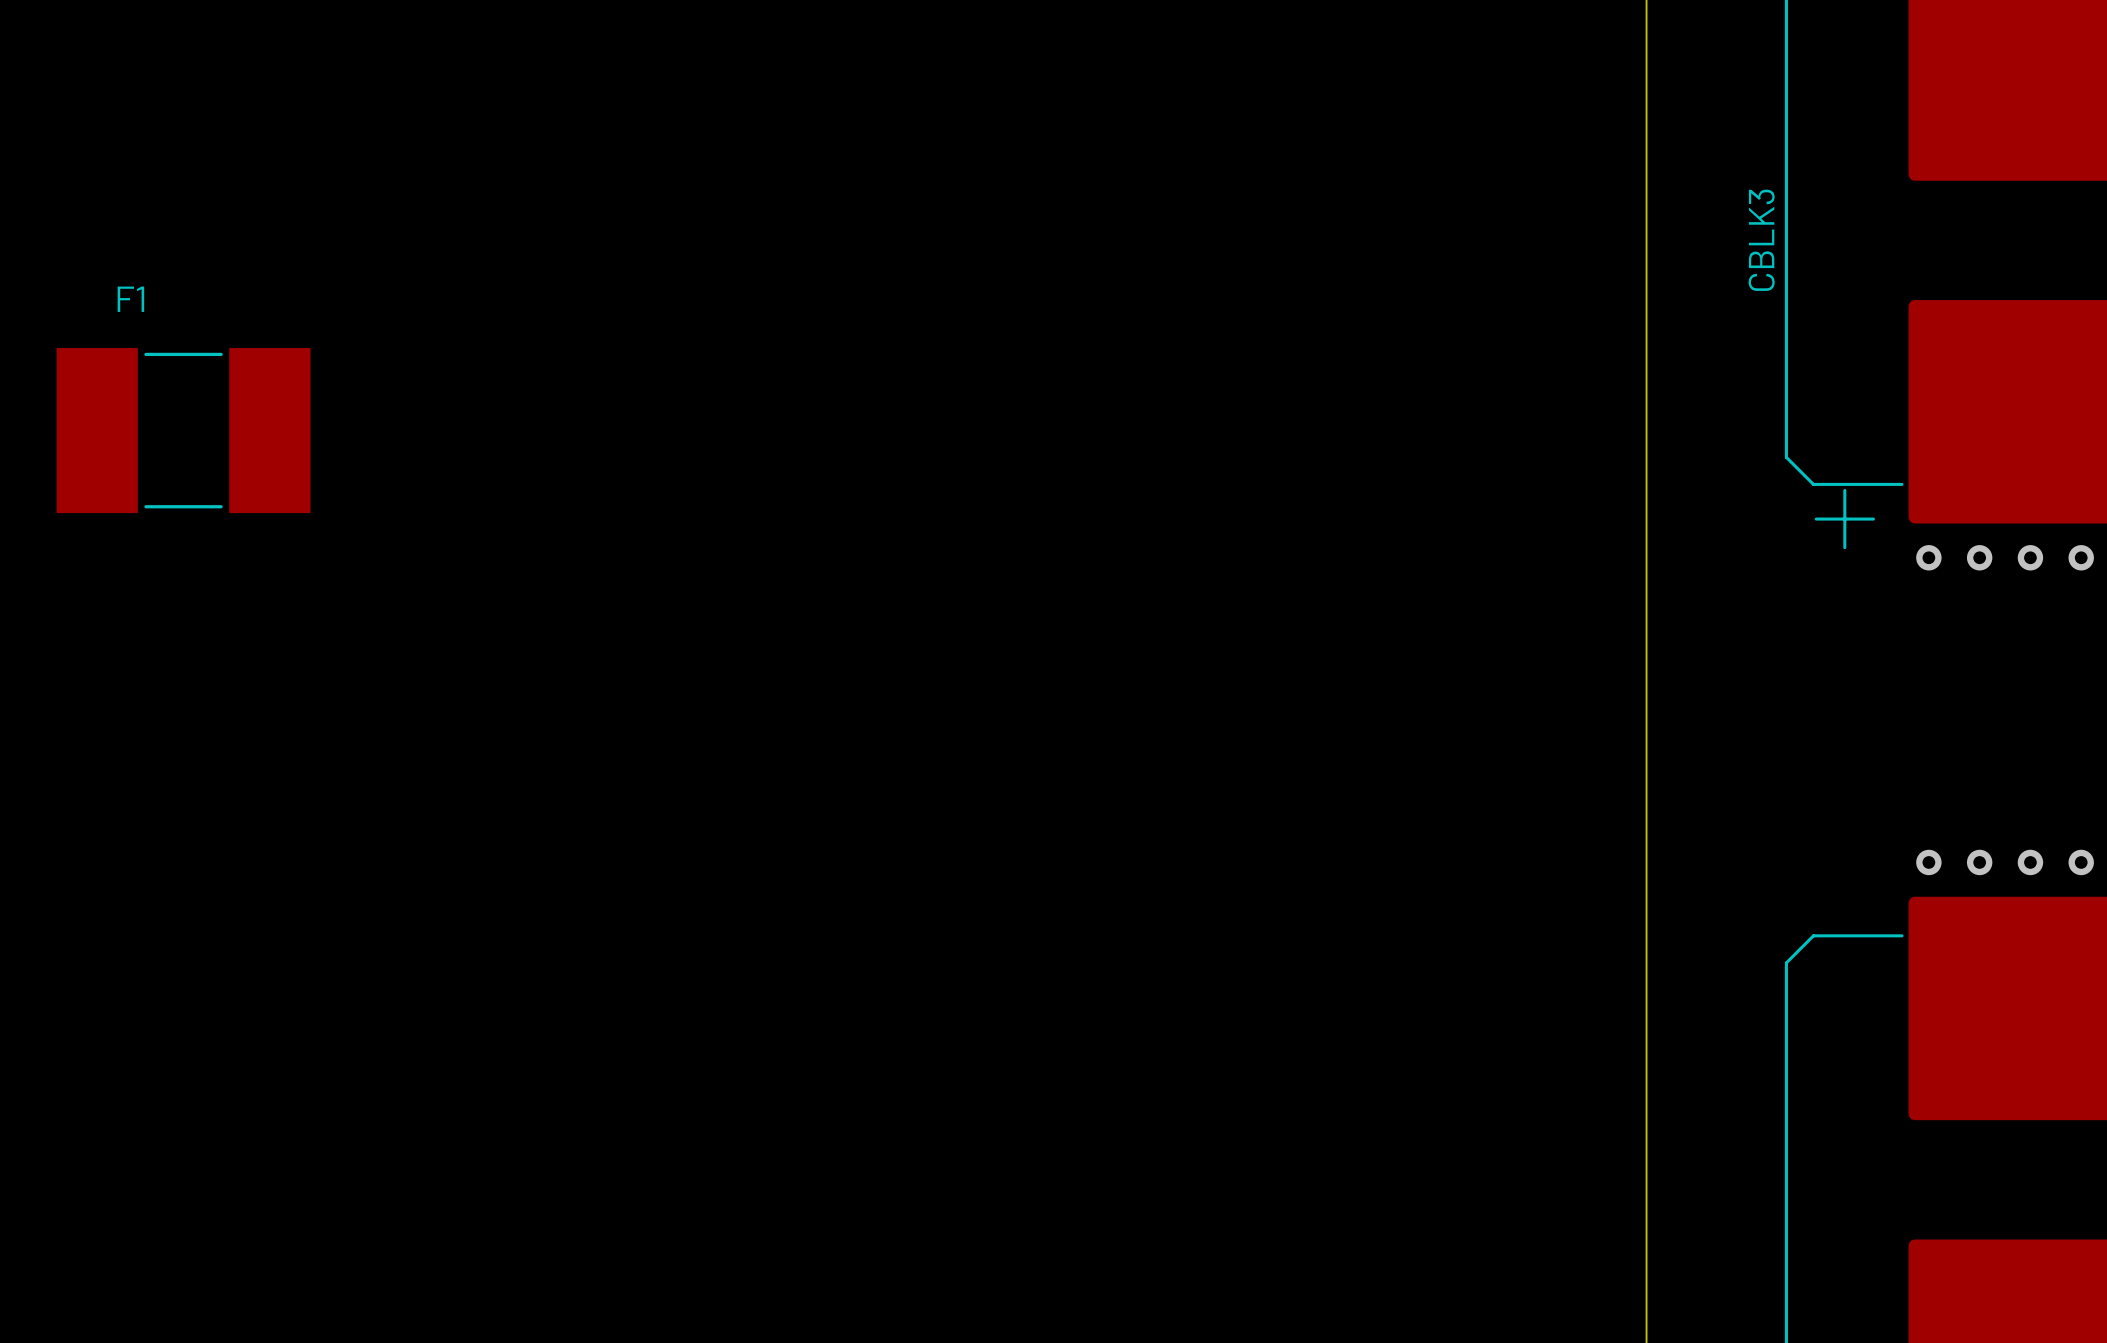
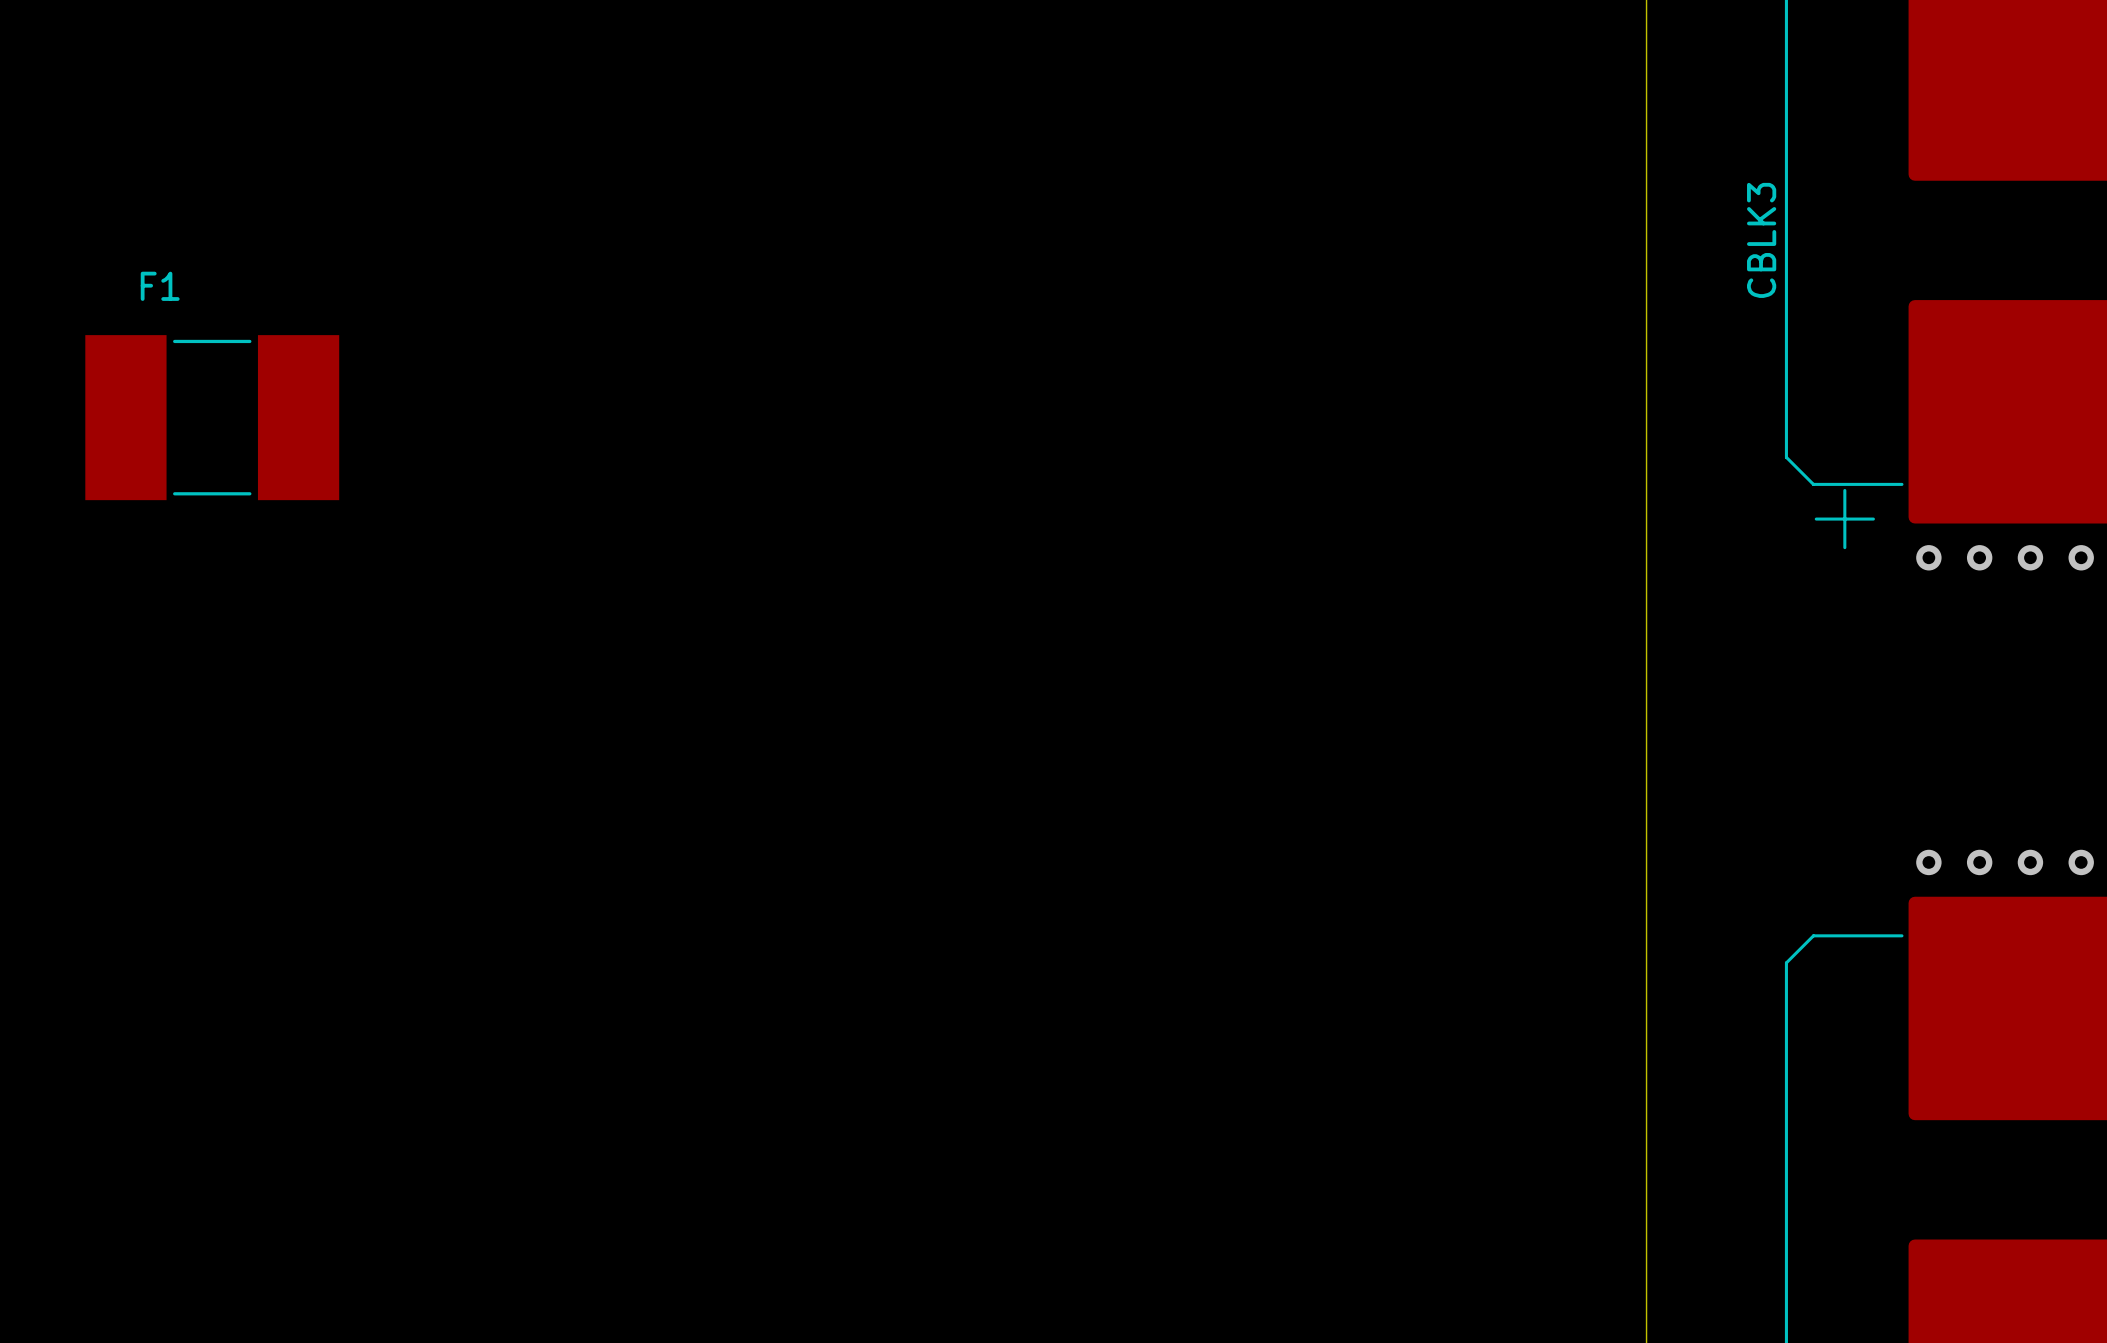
F1 position: (183, 430) -> (212, 417)

